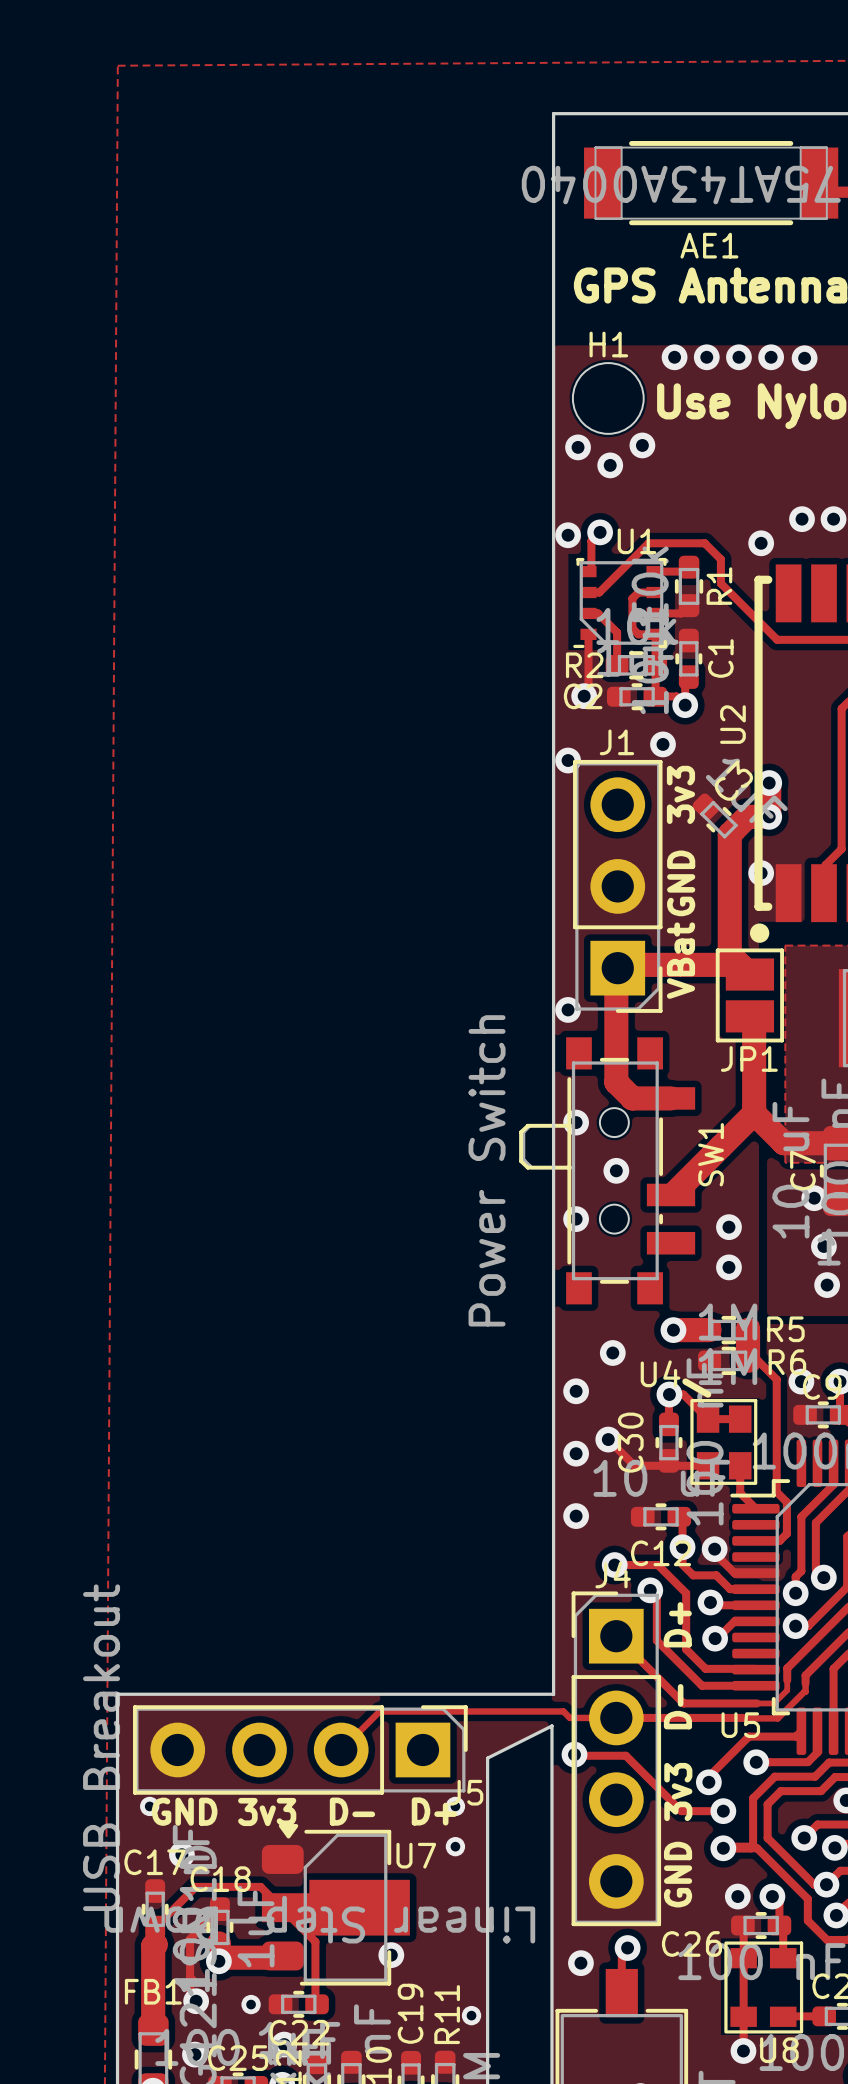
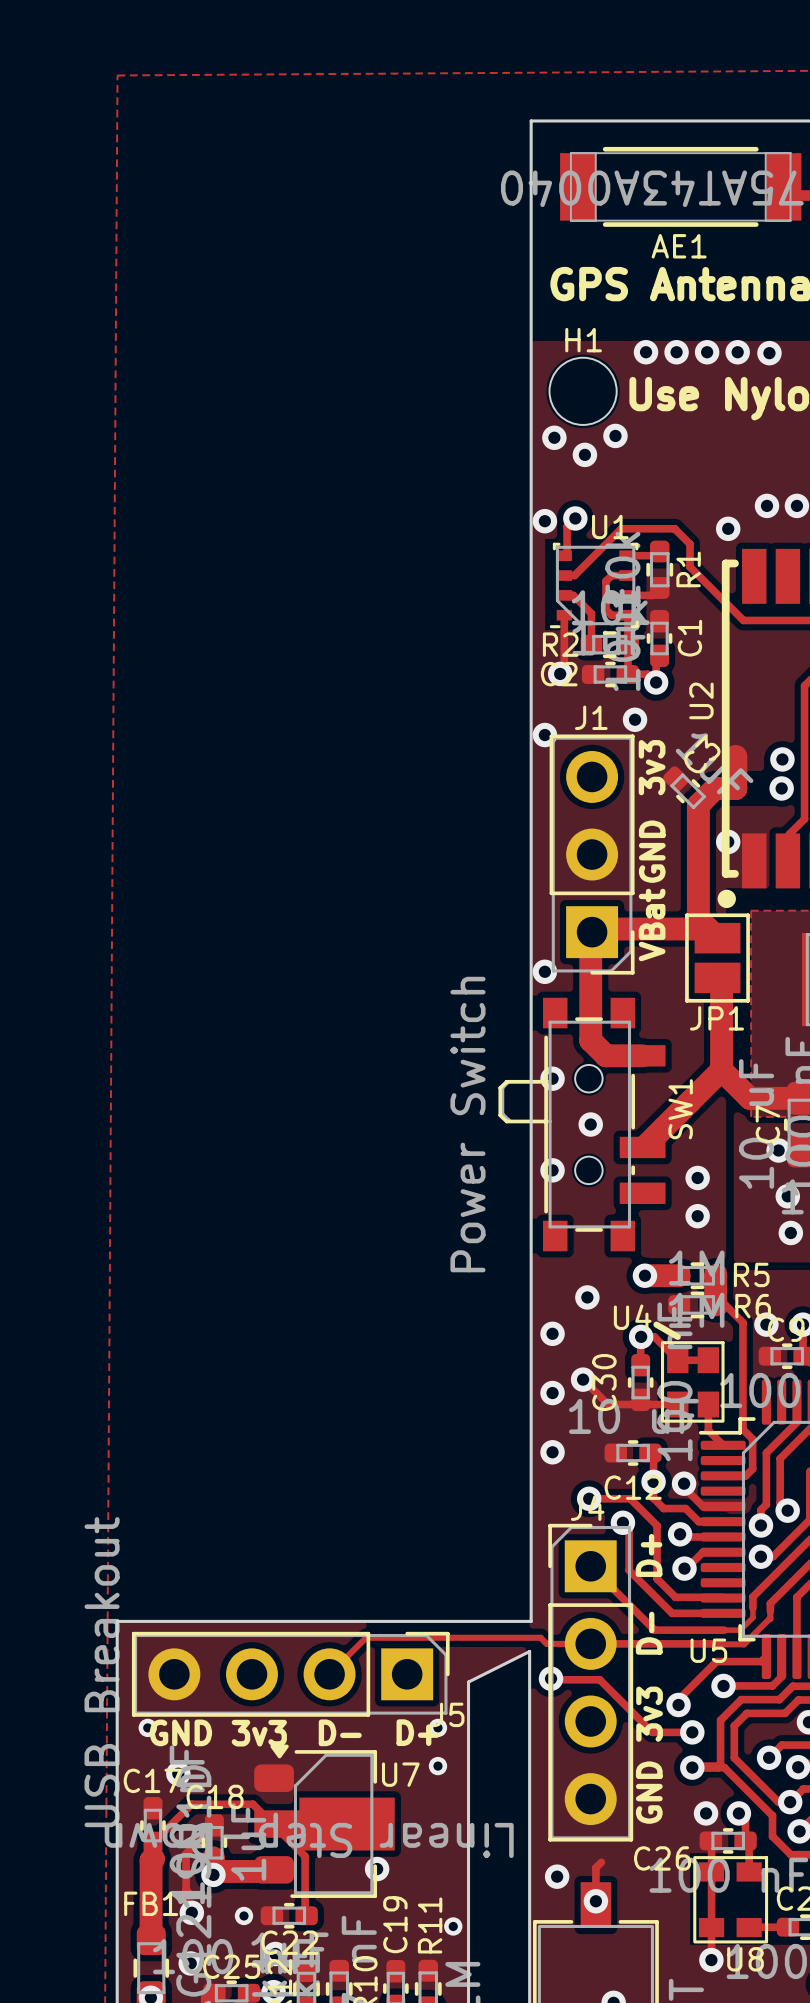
via: (769, 783) -> none
via: none -> (782, 759)
via: (769, 816) -> none
via: none -> (781, 788)
via position: (627, 1948) -> (595, 1901)

